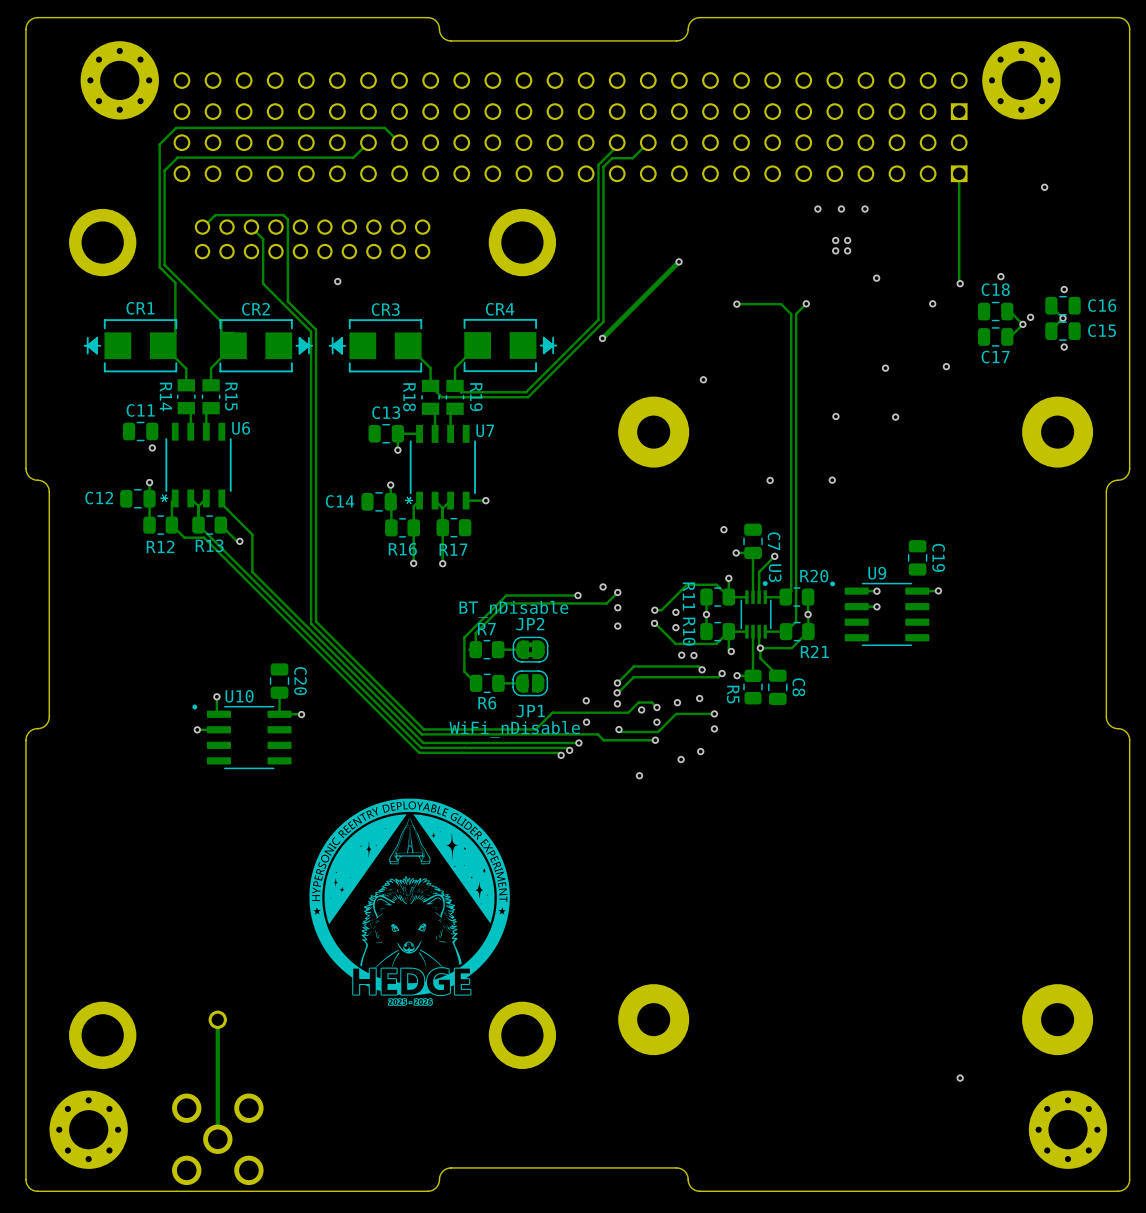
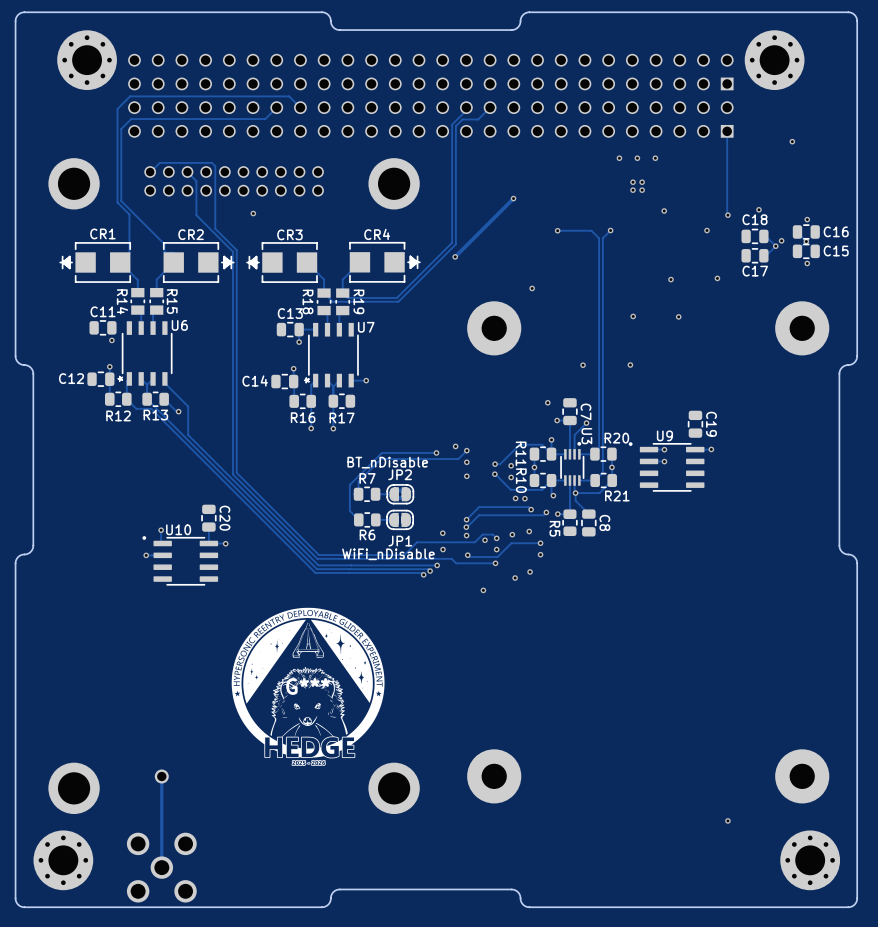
drawing: [309, 798, 510, 1006] -> none
G***: none -> (308, 686)

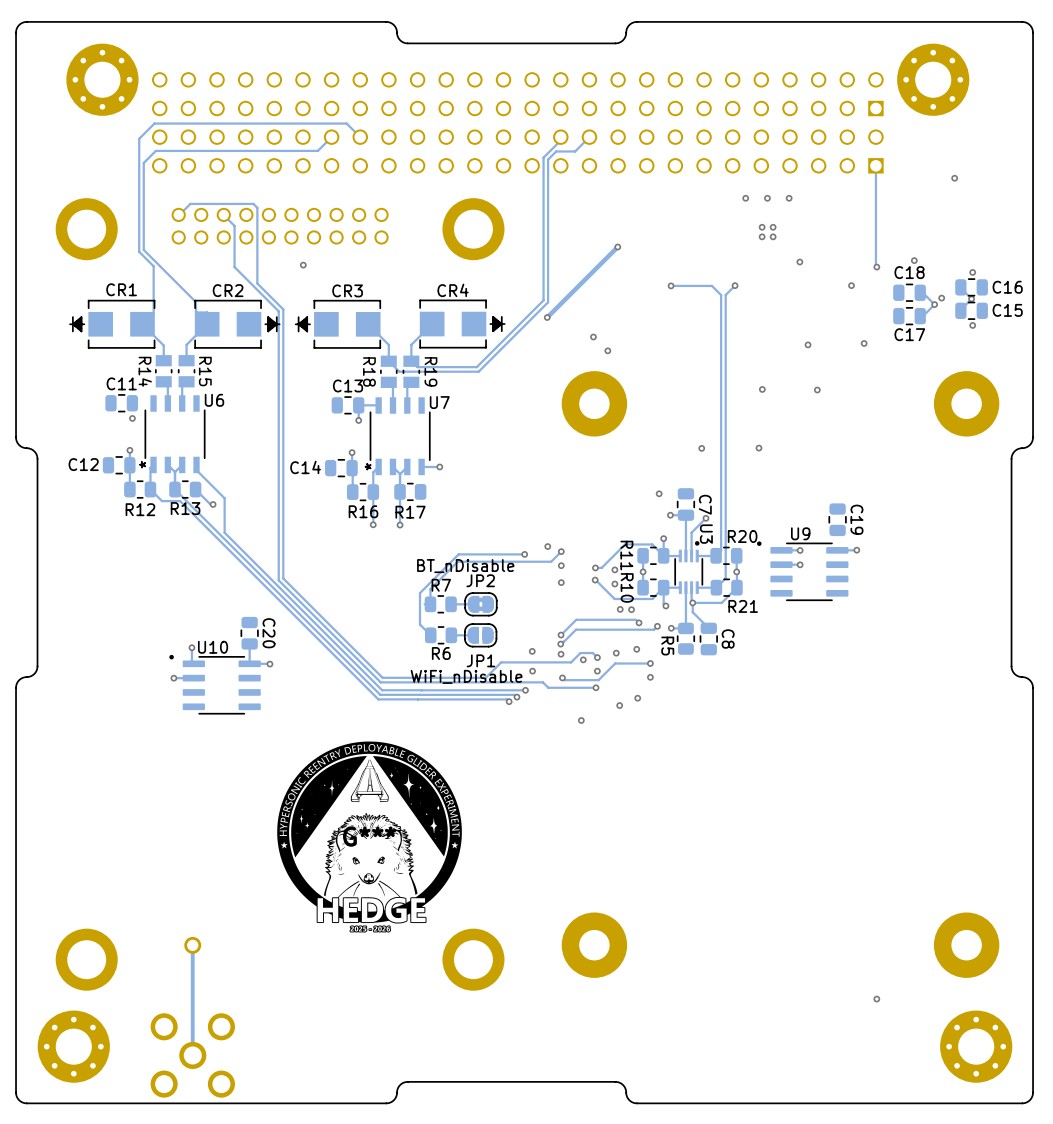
via: none -> (593, 337)
via: none -> (607, 350)
via: (532, 288) -> none

